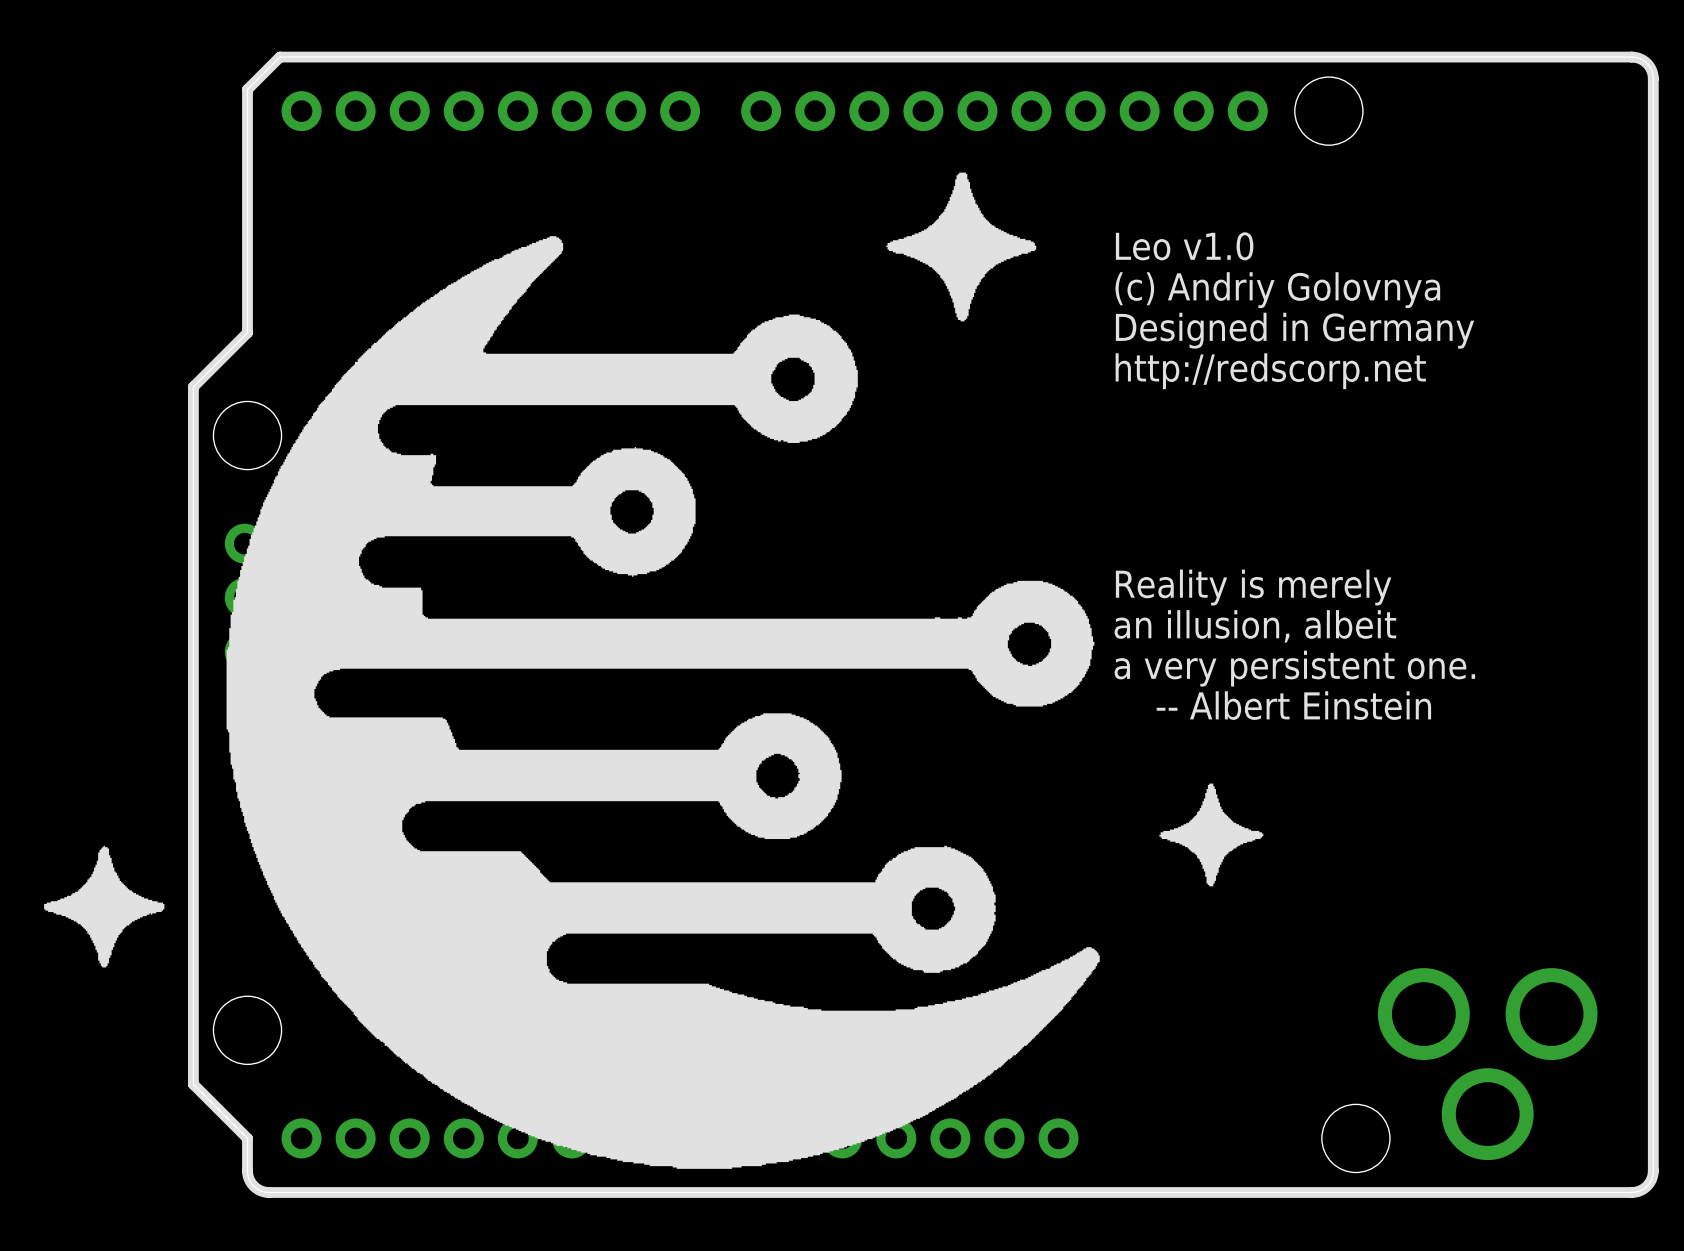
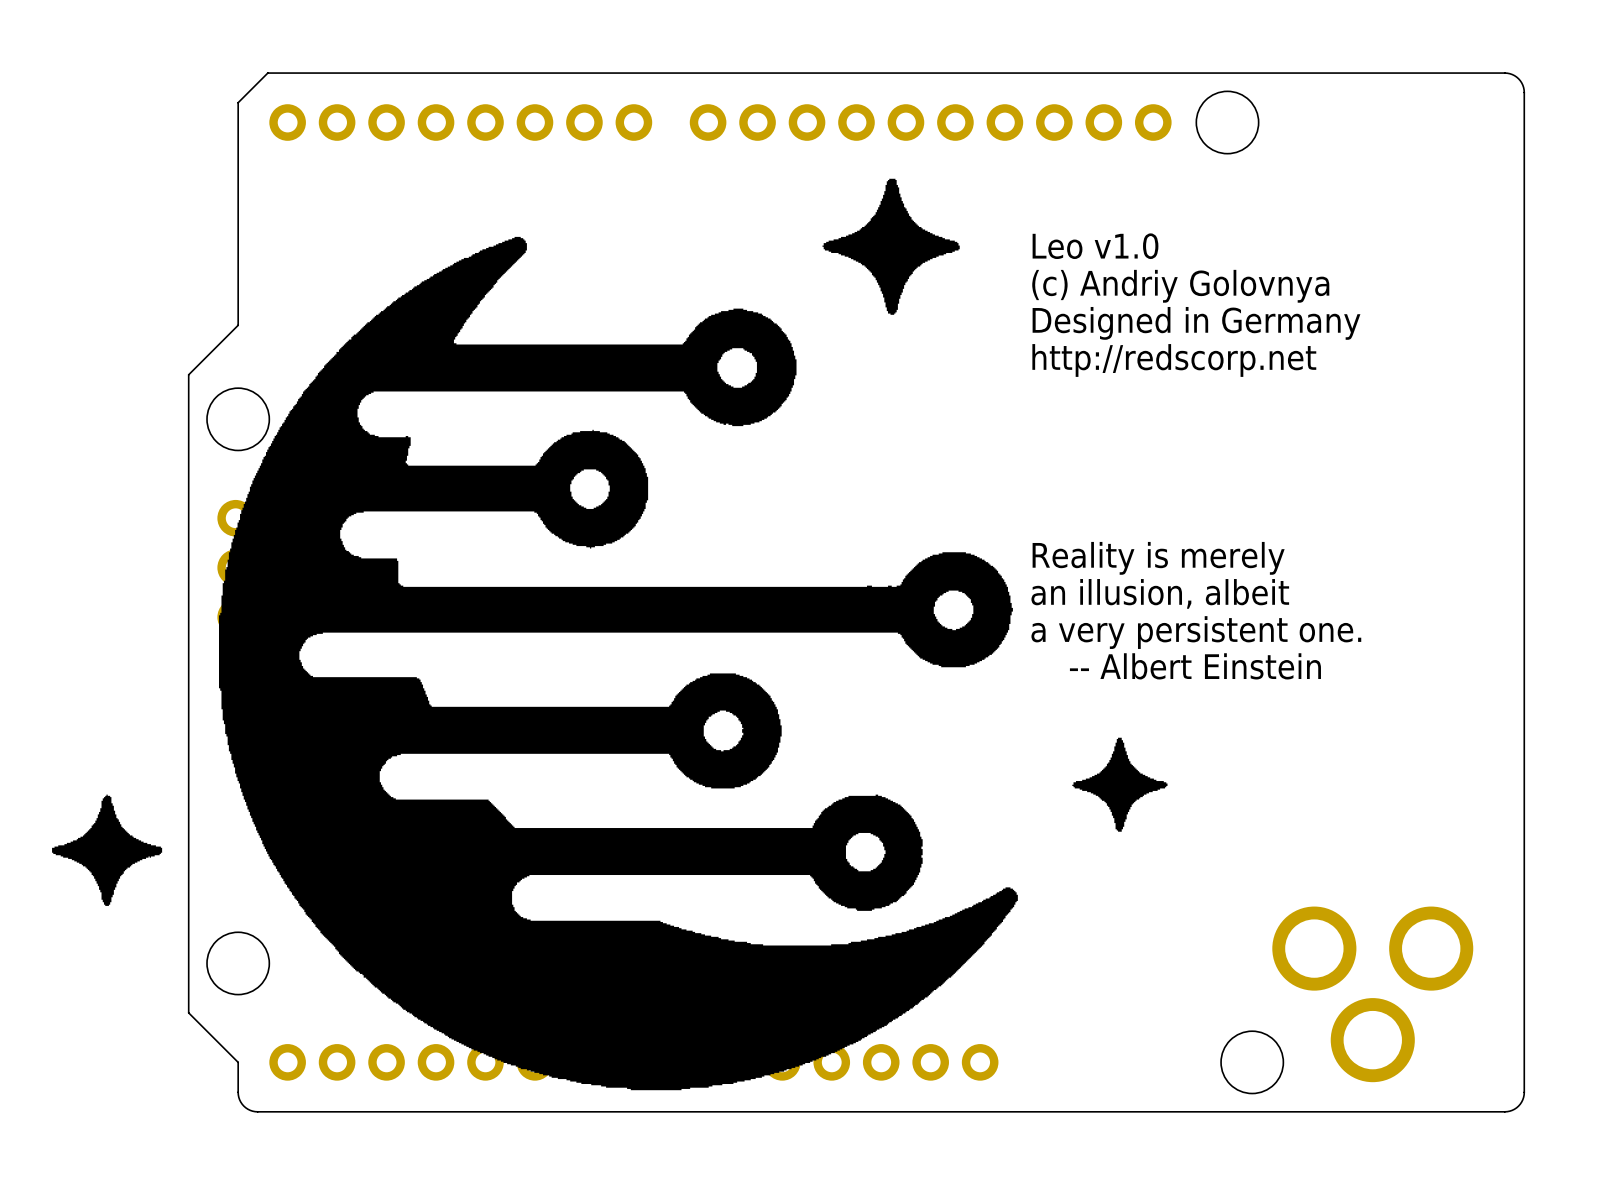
line: (1631, 57) (279, 57) (247, 89) (247, 332) (193, 386) (193, 1084) (247, 1138) (247, 1173) (251, 1184) (260, 1190) (269, 1192) (1631, 1192) (1644, 1188) (1651, 1179) (1653, 1170) (1653, 78) (1651, 70) (1646, 63) (1639, 58) (1631, 57) -> none

